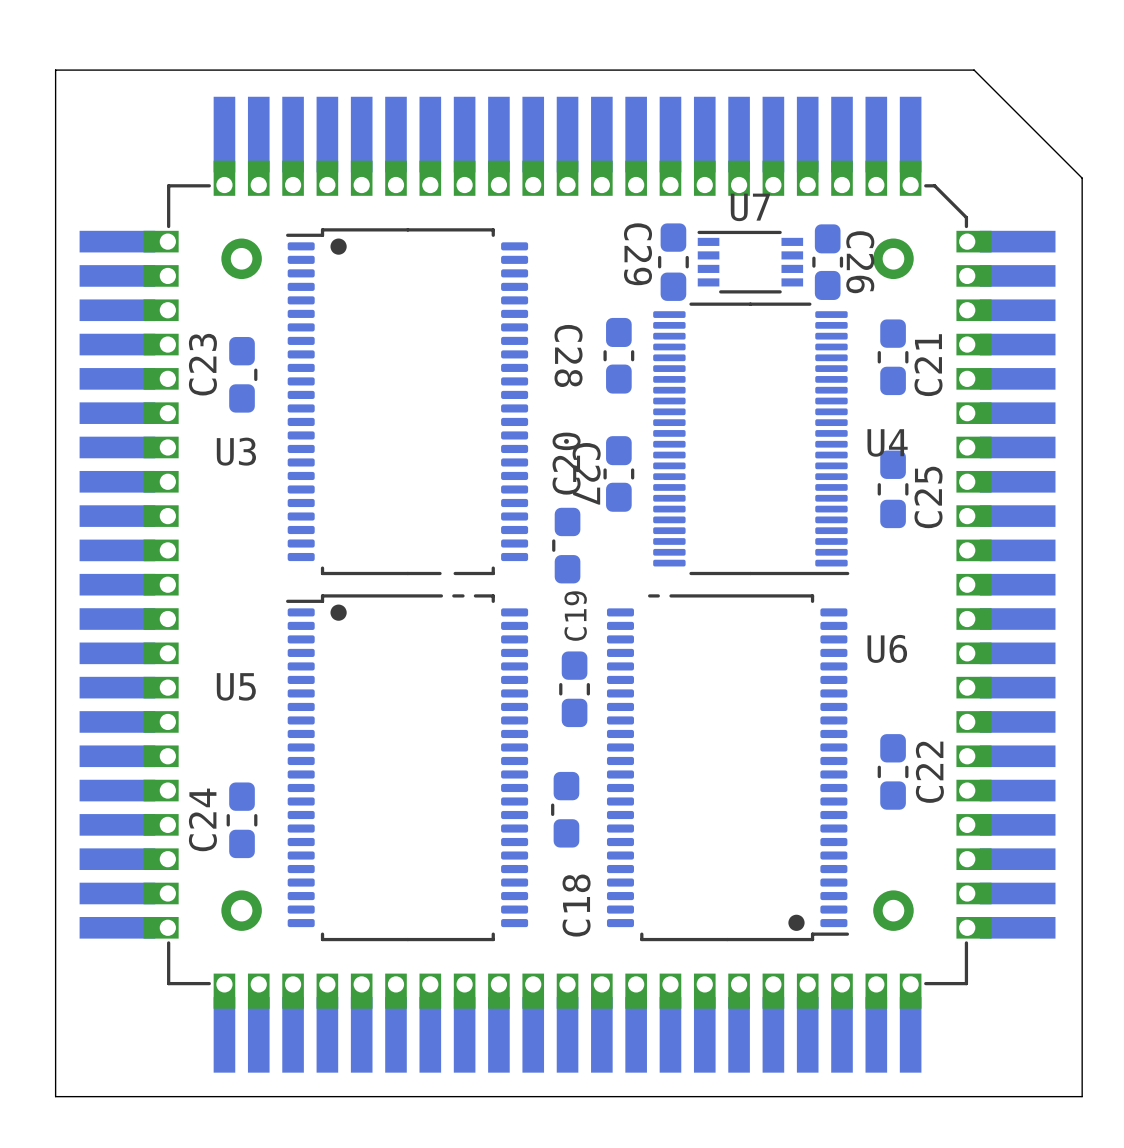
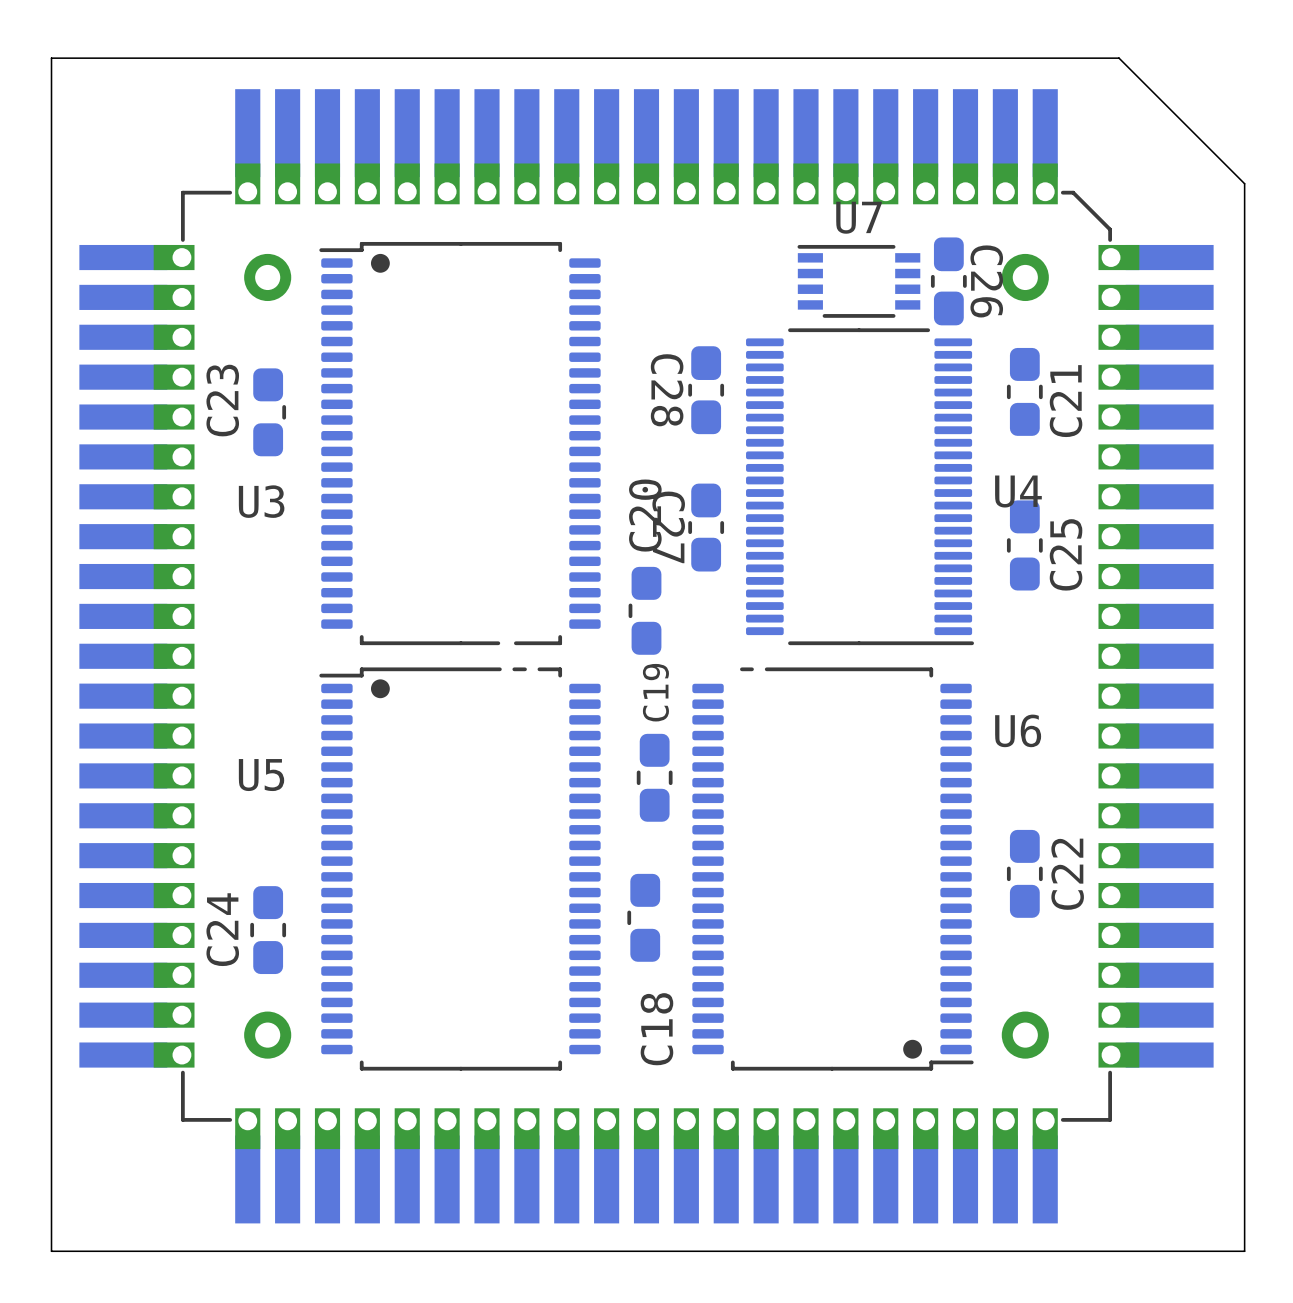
C29: (673, 262) -> none
C28 name position: C28 (568, 355) -> C28 (667, 390)

